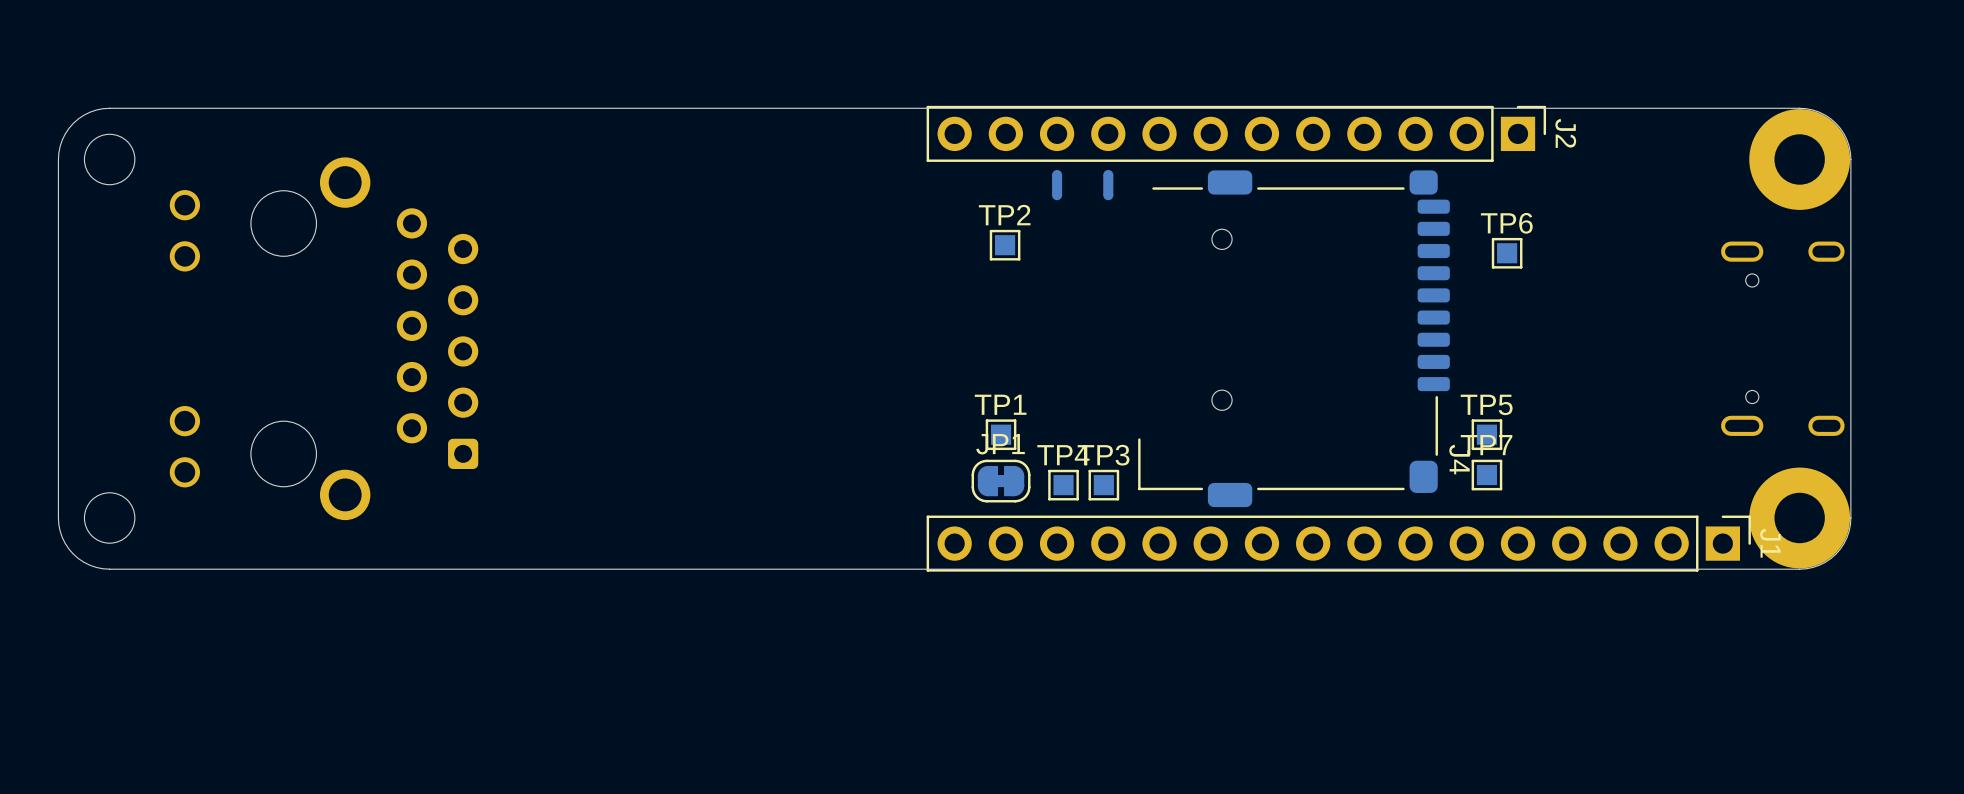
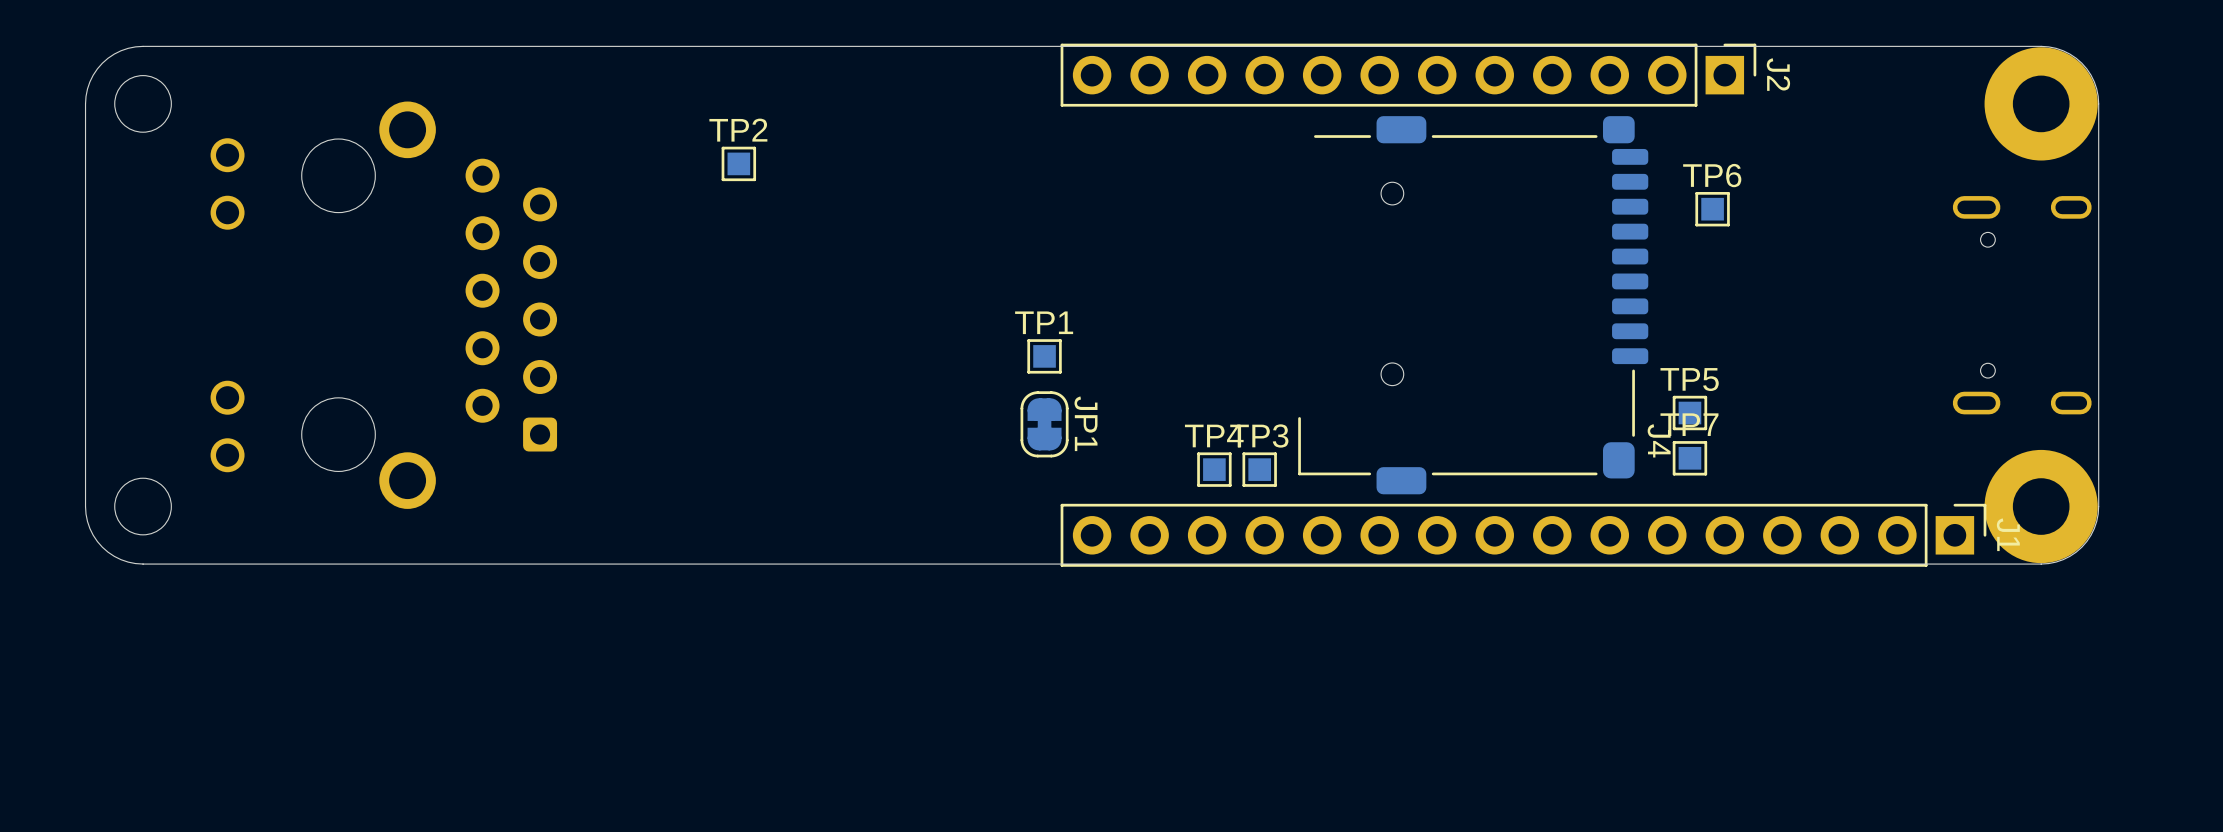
part: (1057, 185) -> none
part: (1108, 185) -> none
TP2 position: (1005, 245) -> (738, 163)
TP1 position: (1001, 434) -> (1044, 356)
JP1 rotation: 0° (1001, 481) -> 90° clockwise (1044, 424)
JP1 position: (1001, 481) -> (1044, 424)

